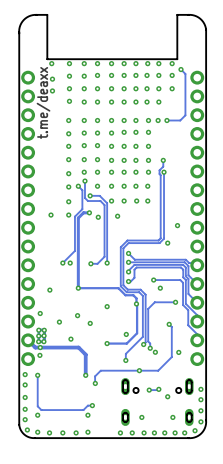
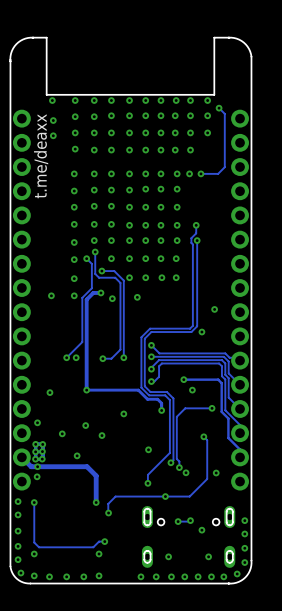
track: (136, 303) (137, 333) (126, 343) (107, 343) -> none
via: (107, 343) -> none

